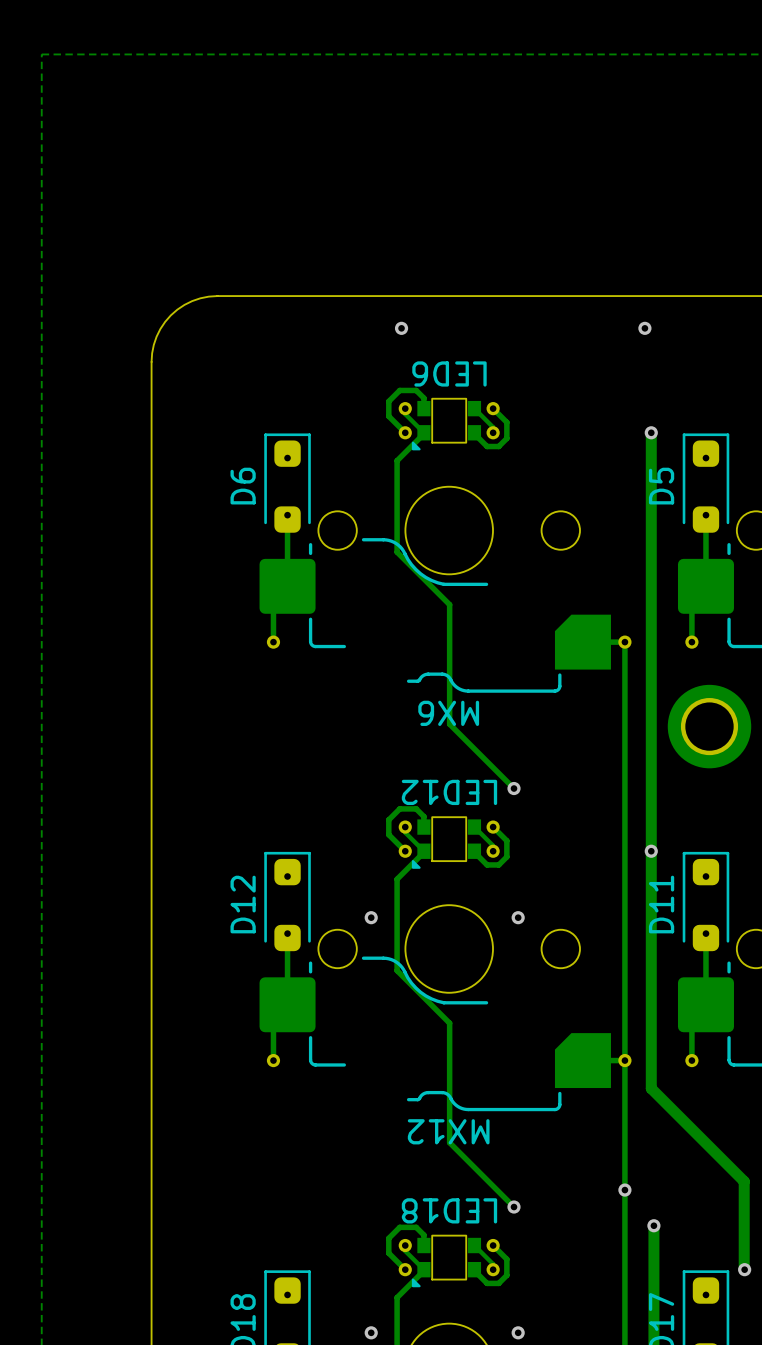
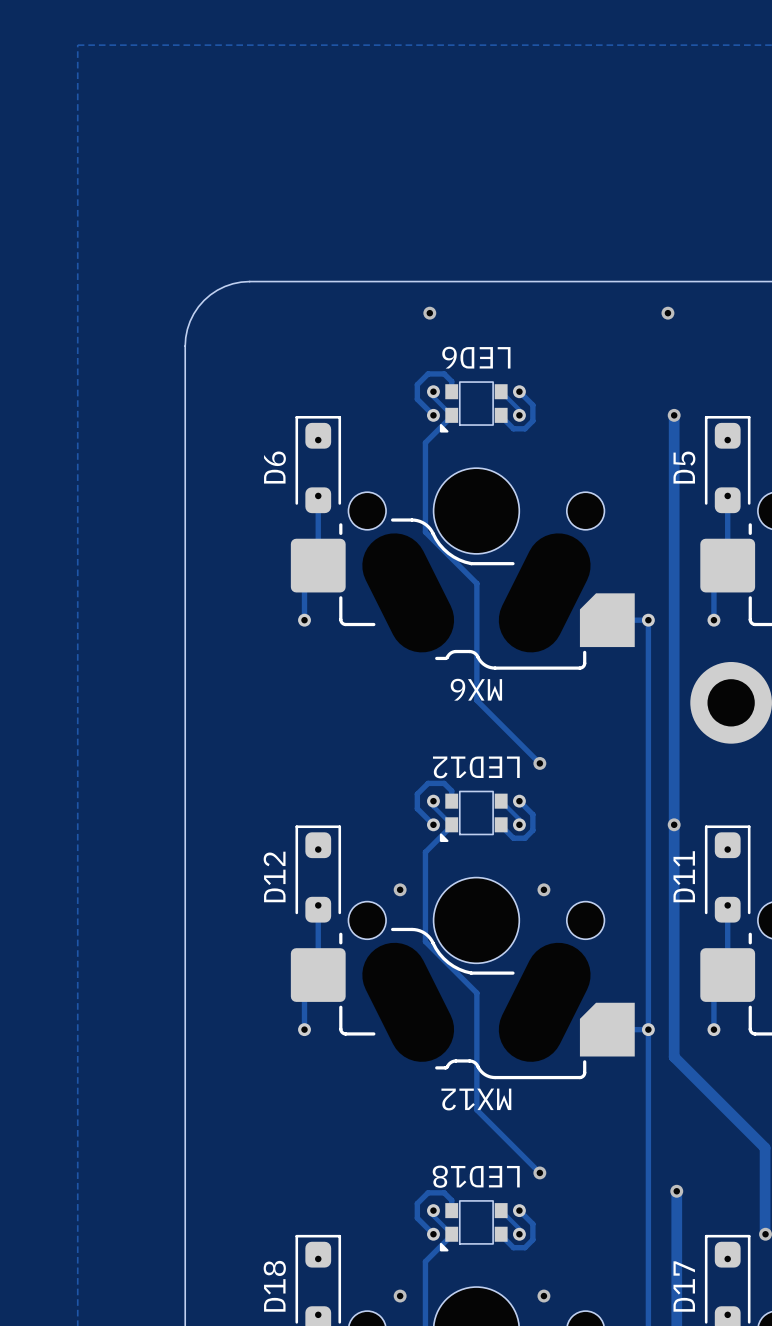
via: (624, 1190) -> none

